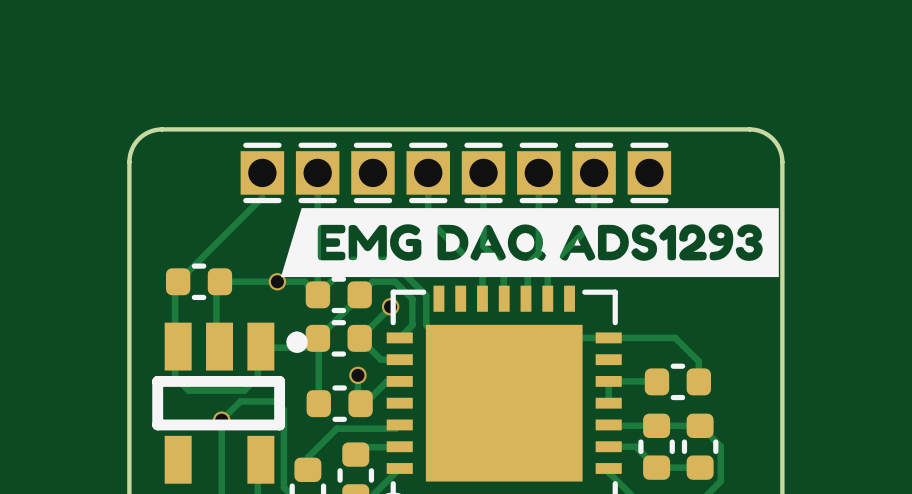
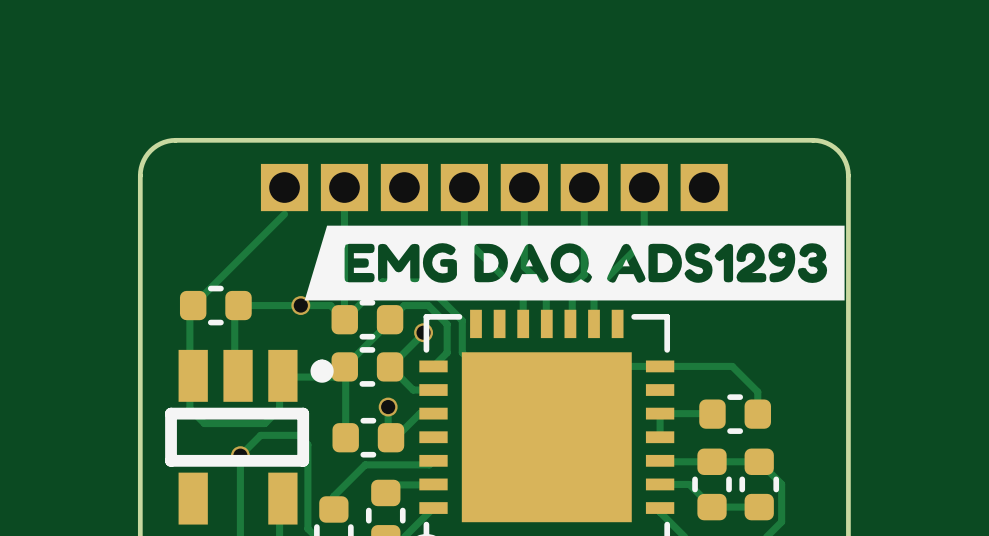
part footprint: [240, 142, 285, 204] -> [260, 163, 309, 212]
part footprint: [295, 142, 340, 204] -> [320, 163, 369, 212]
part footprint: [351, 142, 395, 204] -> [380, 163, 429, 212]
part footprint: [406, 142, 451, 204] -> [440, 163, 489, 212]
part footprint: [461, 142, 506, 204] -> [500, 163, 548, 212]
part footprint: [517, 142, 561, 204] -> [560, 163, 608, 212]
part footprint: [572, 142, 616, 204] -> [620, 163, 668, 212]
part footprint: [627, 142, 672, 204] -> [680, 163, 728, 212]

